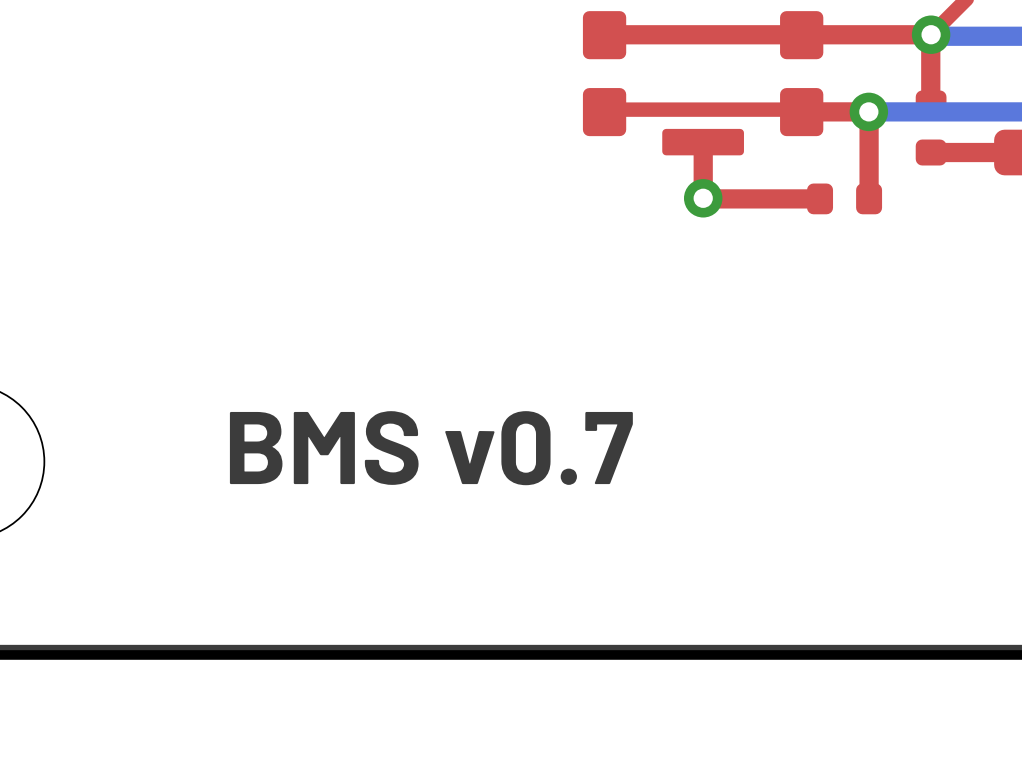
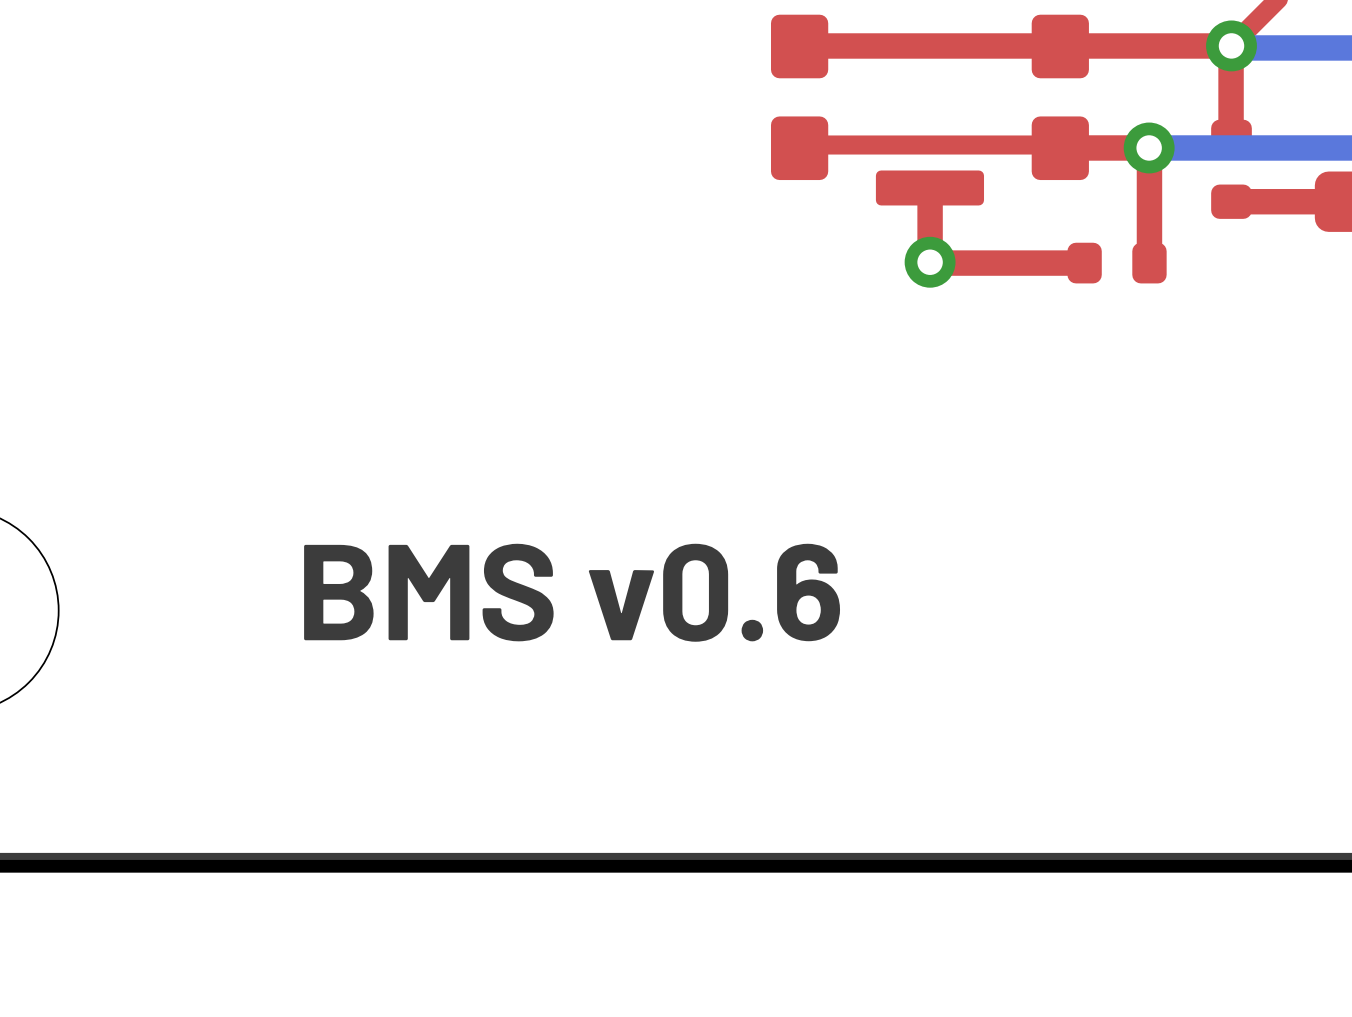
text: BMS v0.7 (431, 448) -> BMS v0.6 (572, 592)

